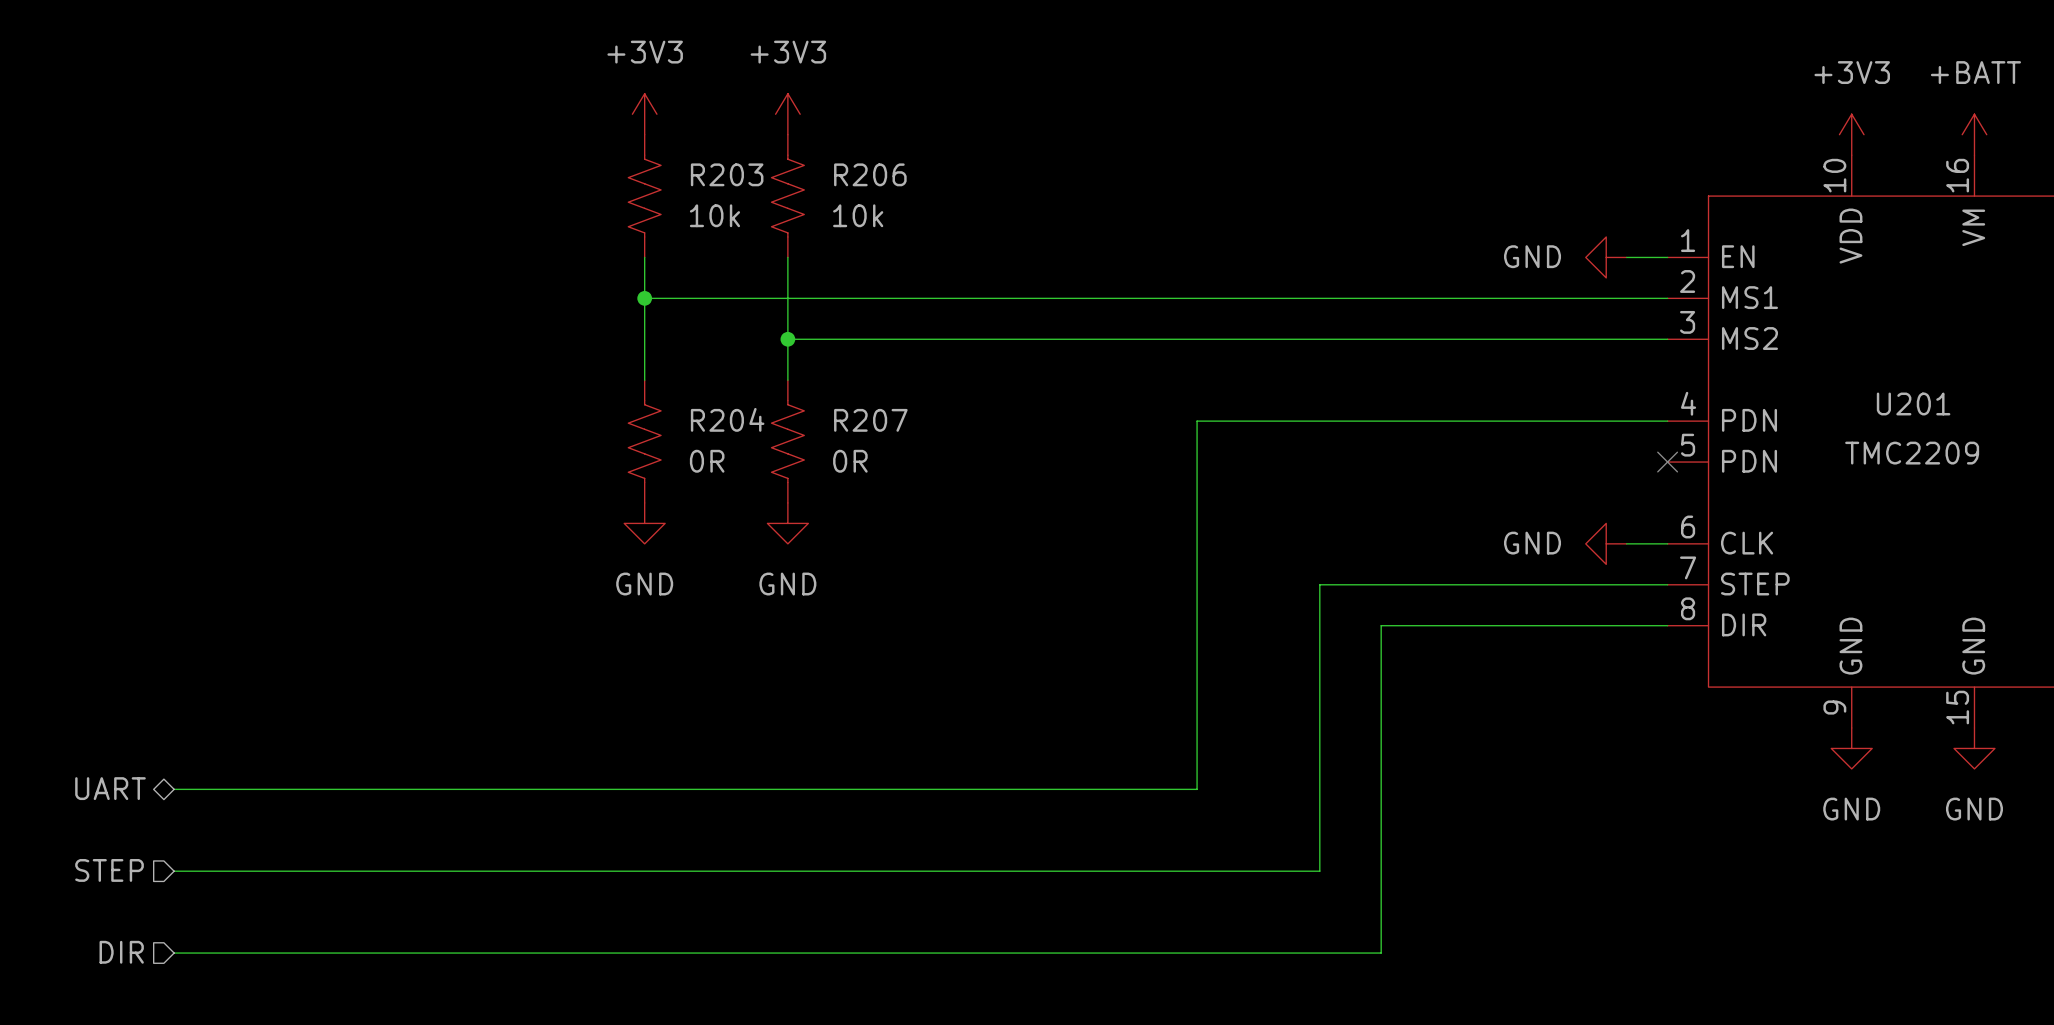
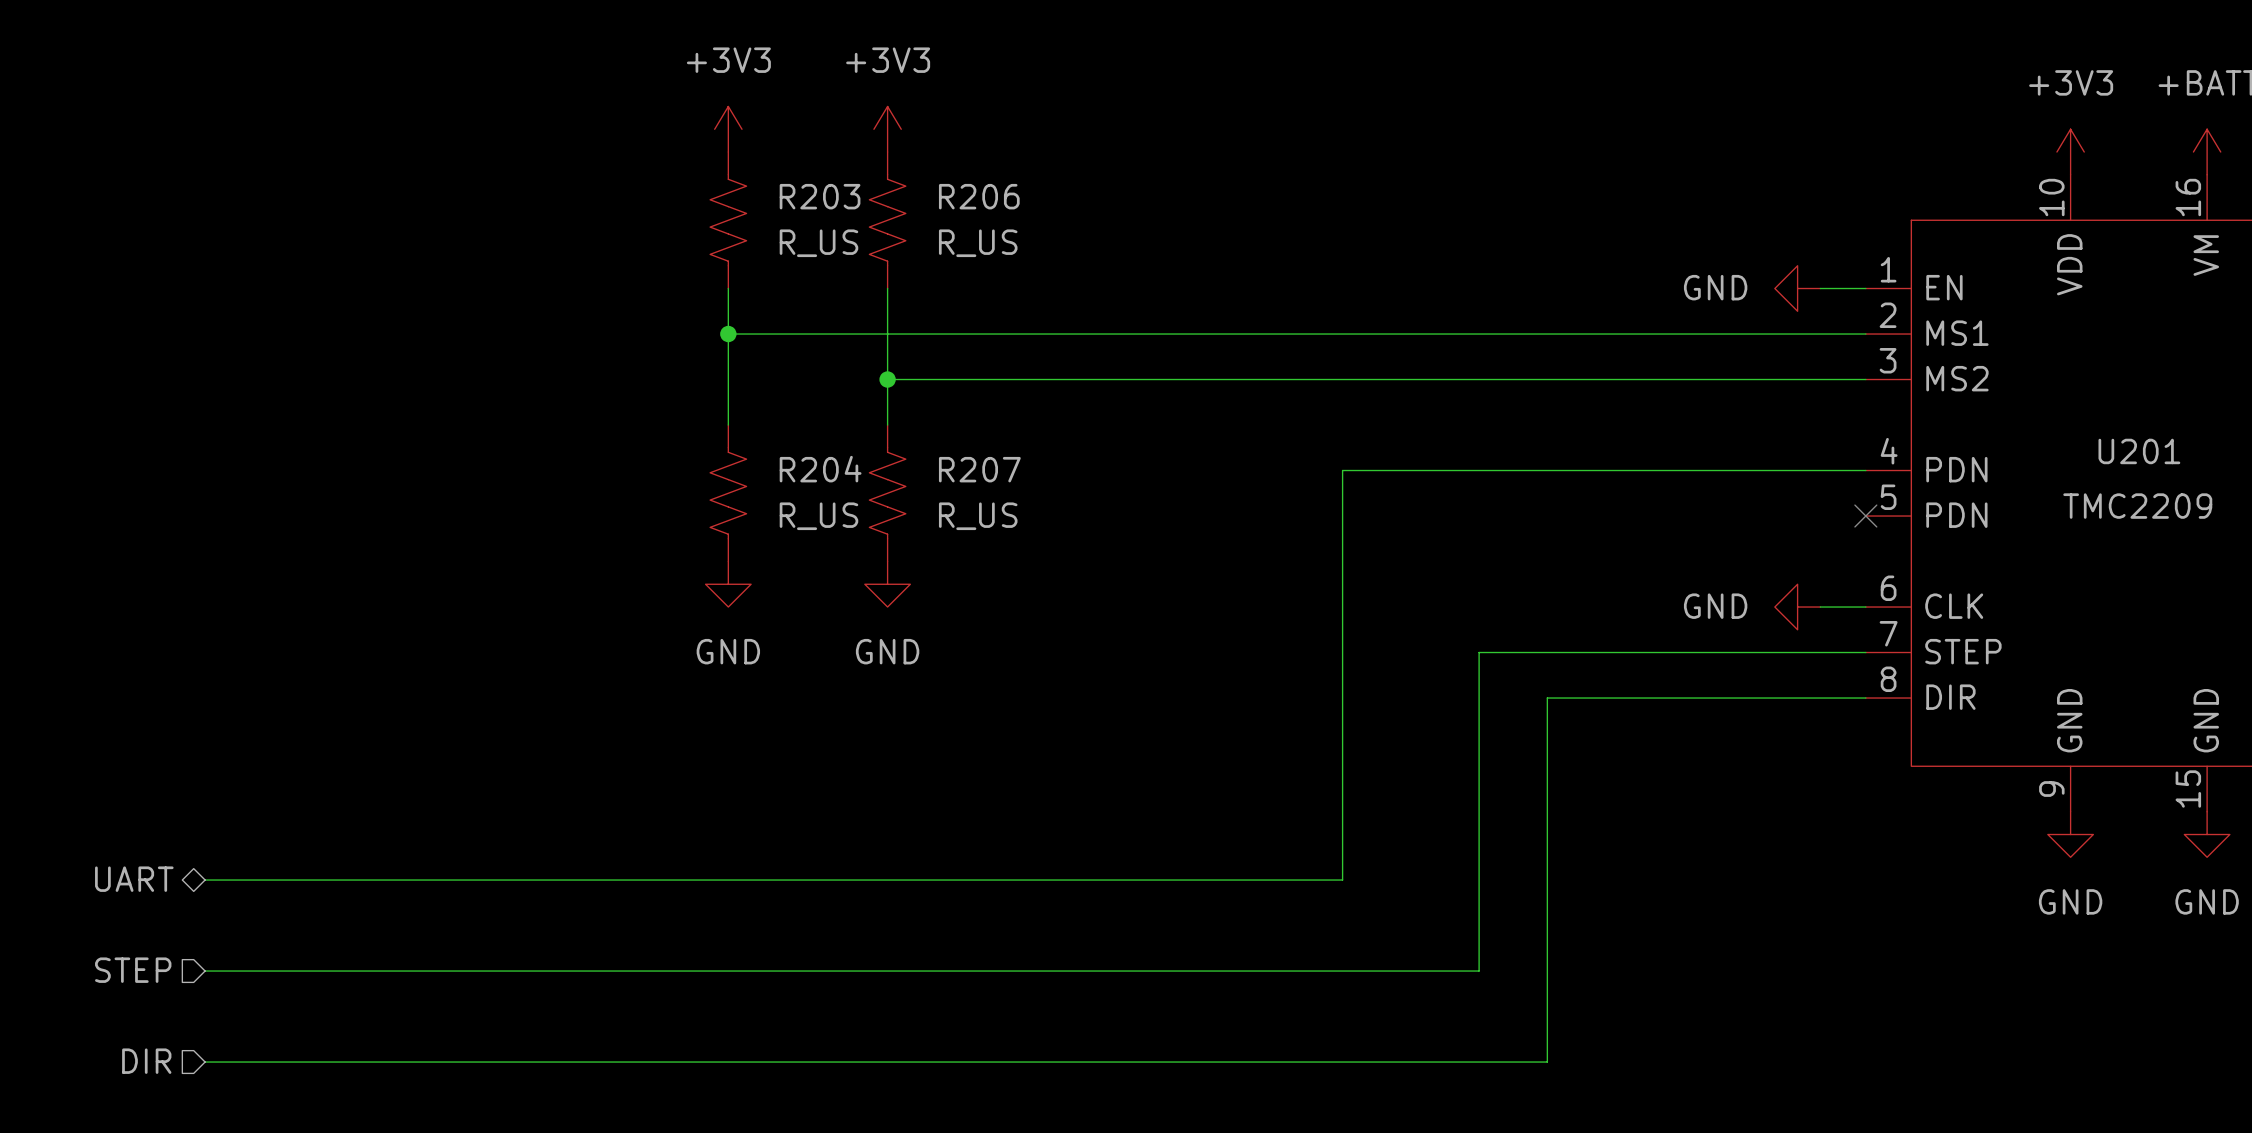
R203 value: 10k (714, 215) -> R_US (818, 243)
R206 value: 10k (858, 215) -> R_US (978, 243)
R204 value: 0R (707, 461) -> R_US (818, 516)
R207 value: 0R (850, 461) -> R_US (978, 516)

